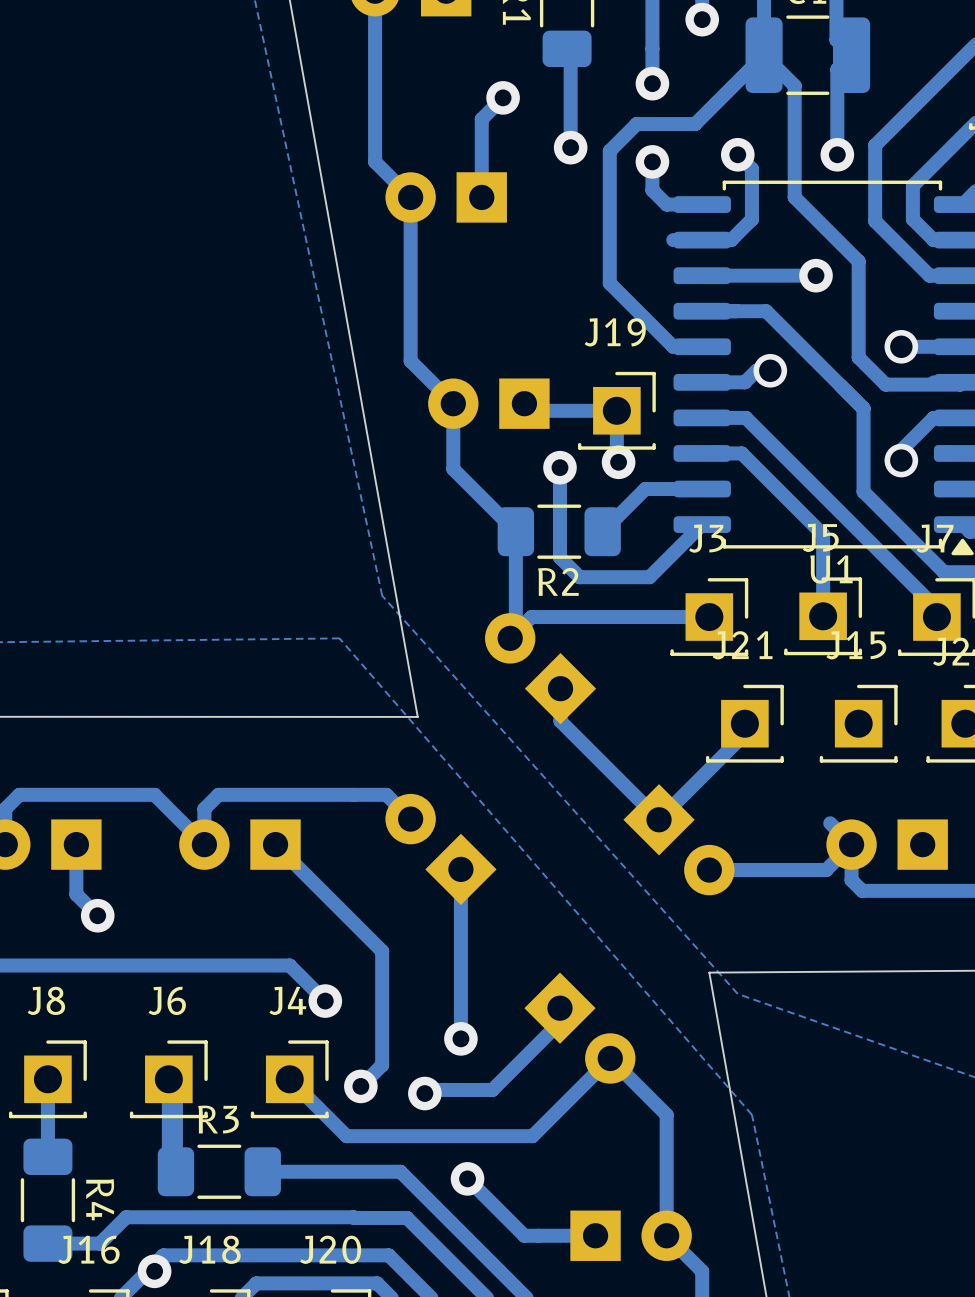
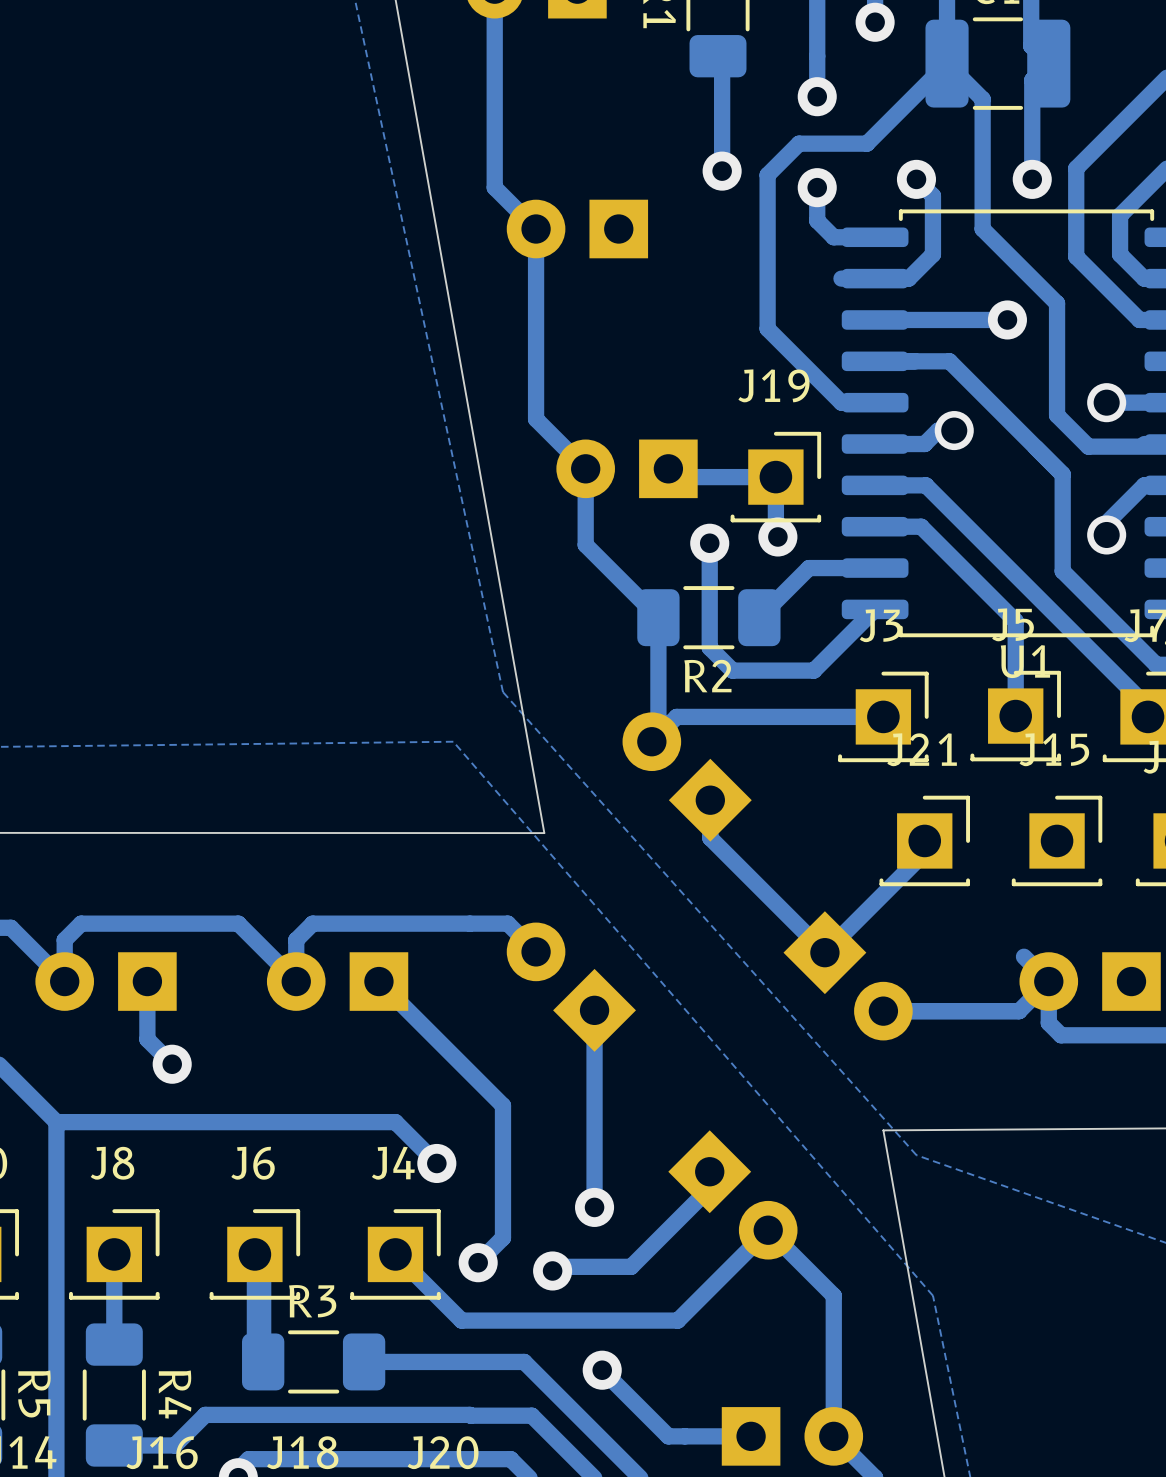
track: (503, 97) (481, 119) (481, 197) -> none
via: (503, 97) -> none

